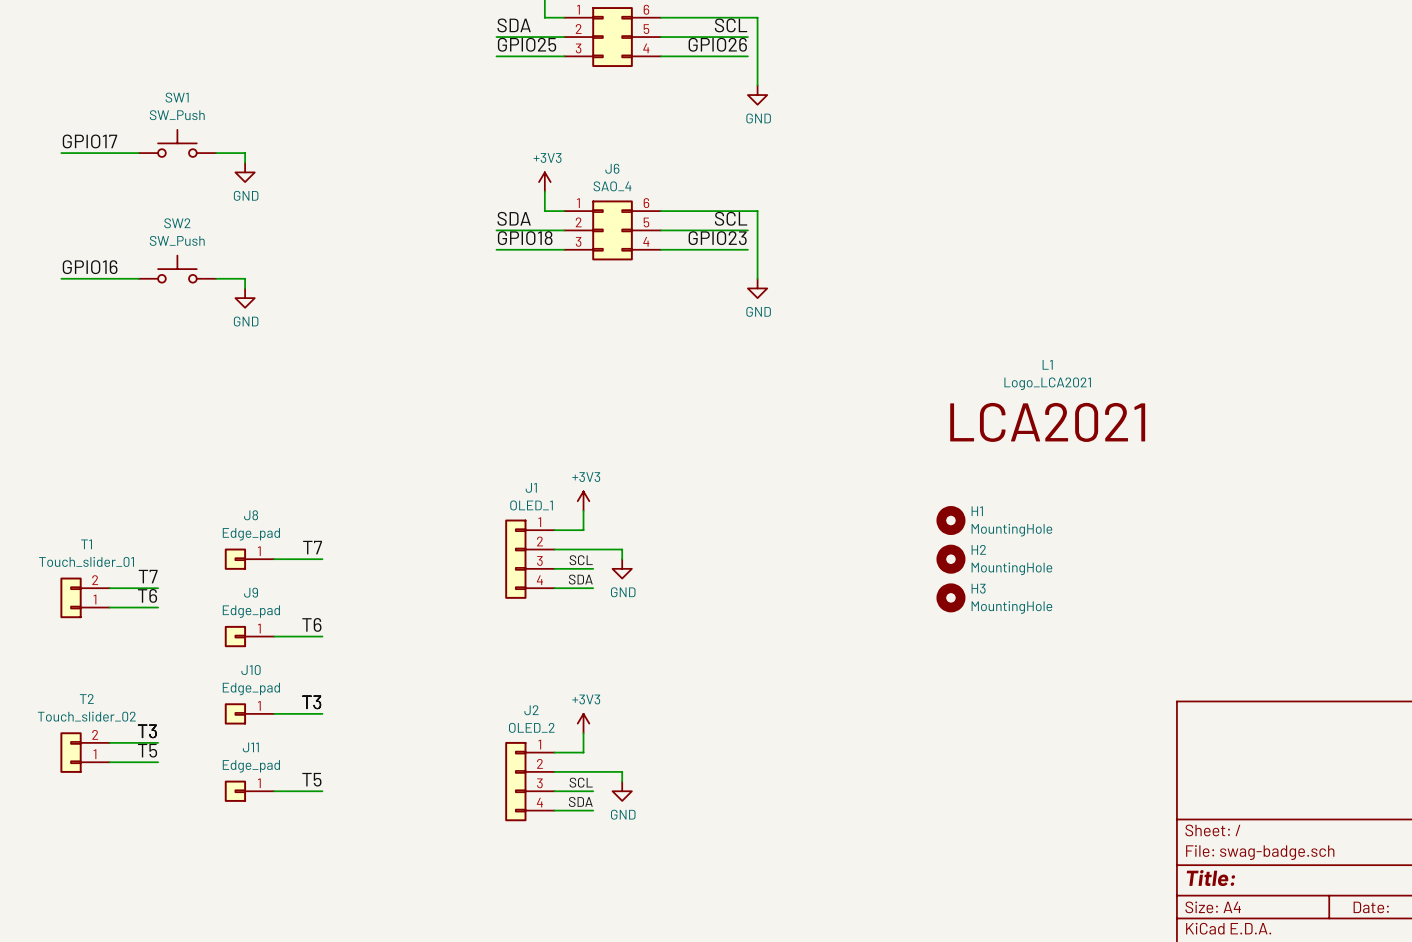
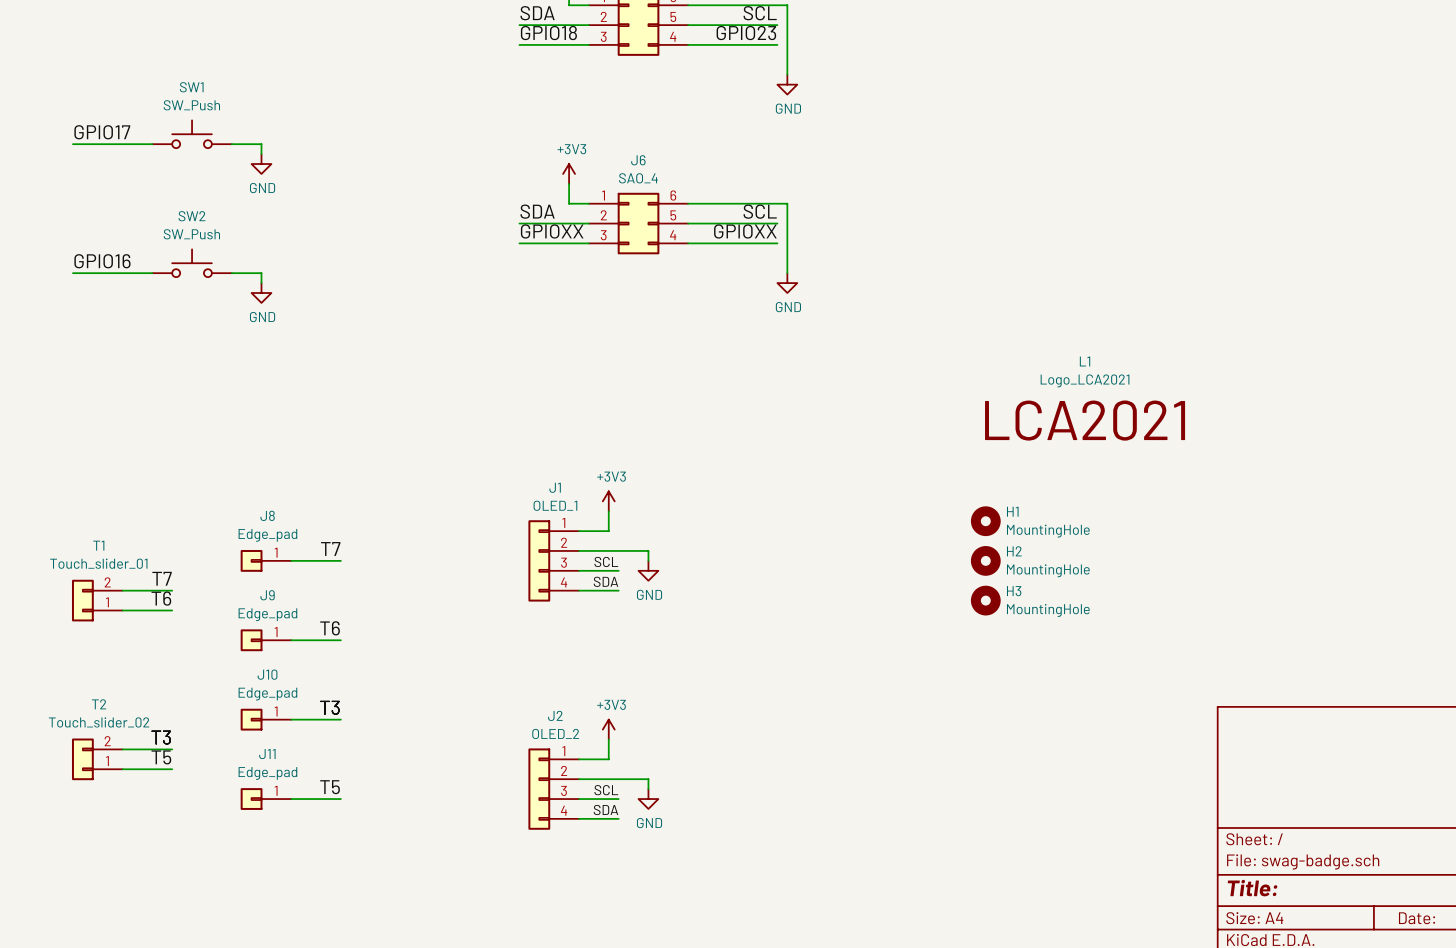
label: GPIO25 (527, 44) -> GPIO18 (548, 33)
label: GPIO26 (717, 44) -> GPIO23 (746, 33)
label: GPIO18 (525, 238) -> GPIOXX (552, 231)
label: GPIO23 (717, 238) -> GPIOXX (745, 231)

